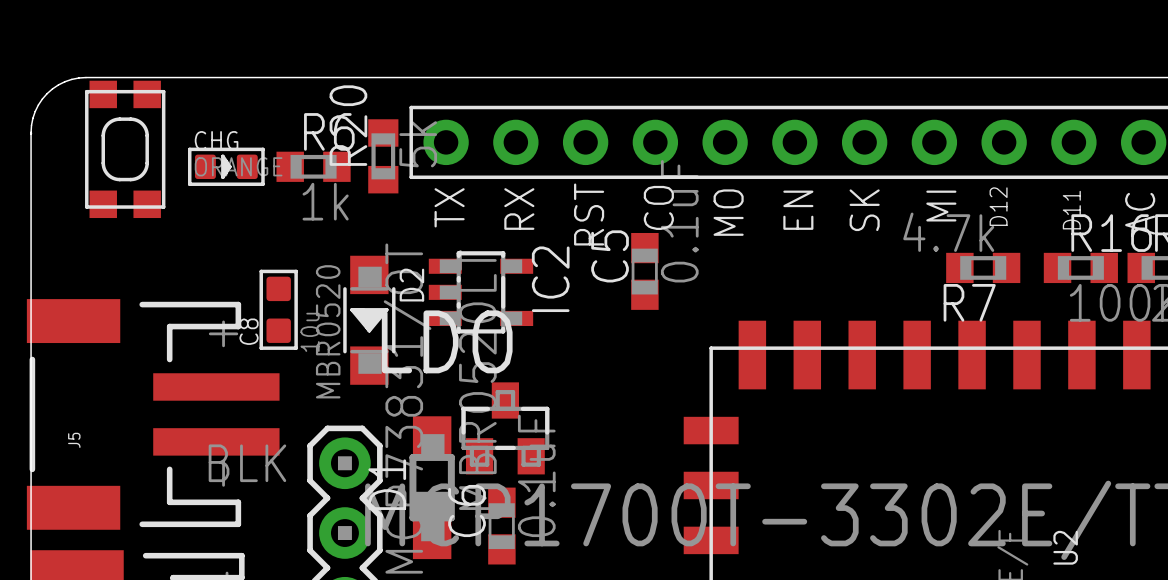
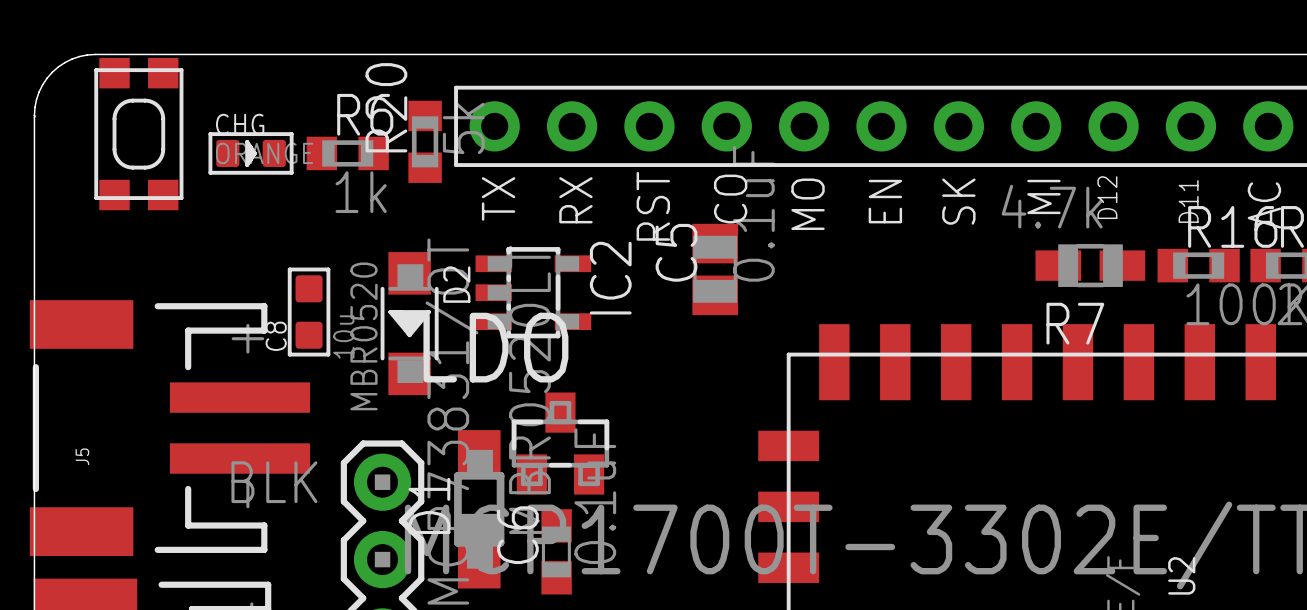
C5 footprint: [631, 232, 659, 310] -> [692, 223, 739, 316]
R7 value position: 4.7k (948, 232) -> 4.7k (1052, 206)
R7 footprint: [946, 252, 1021, 284] -> [1035, 243, 1146, 288]
R7 name position: R7 (969, 302) -> R7 (1075, 323)

